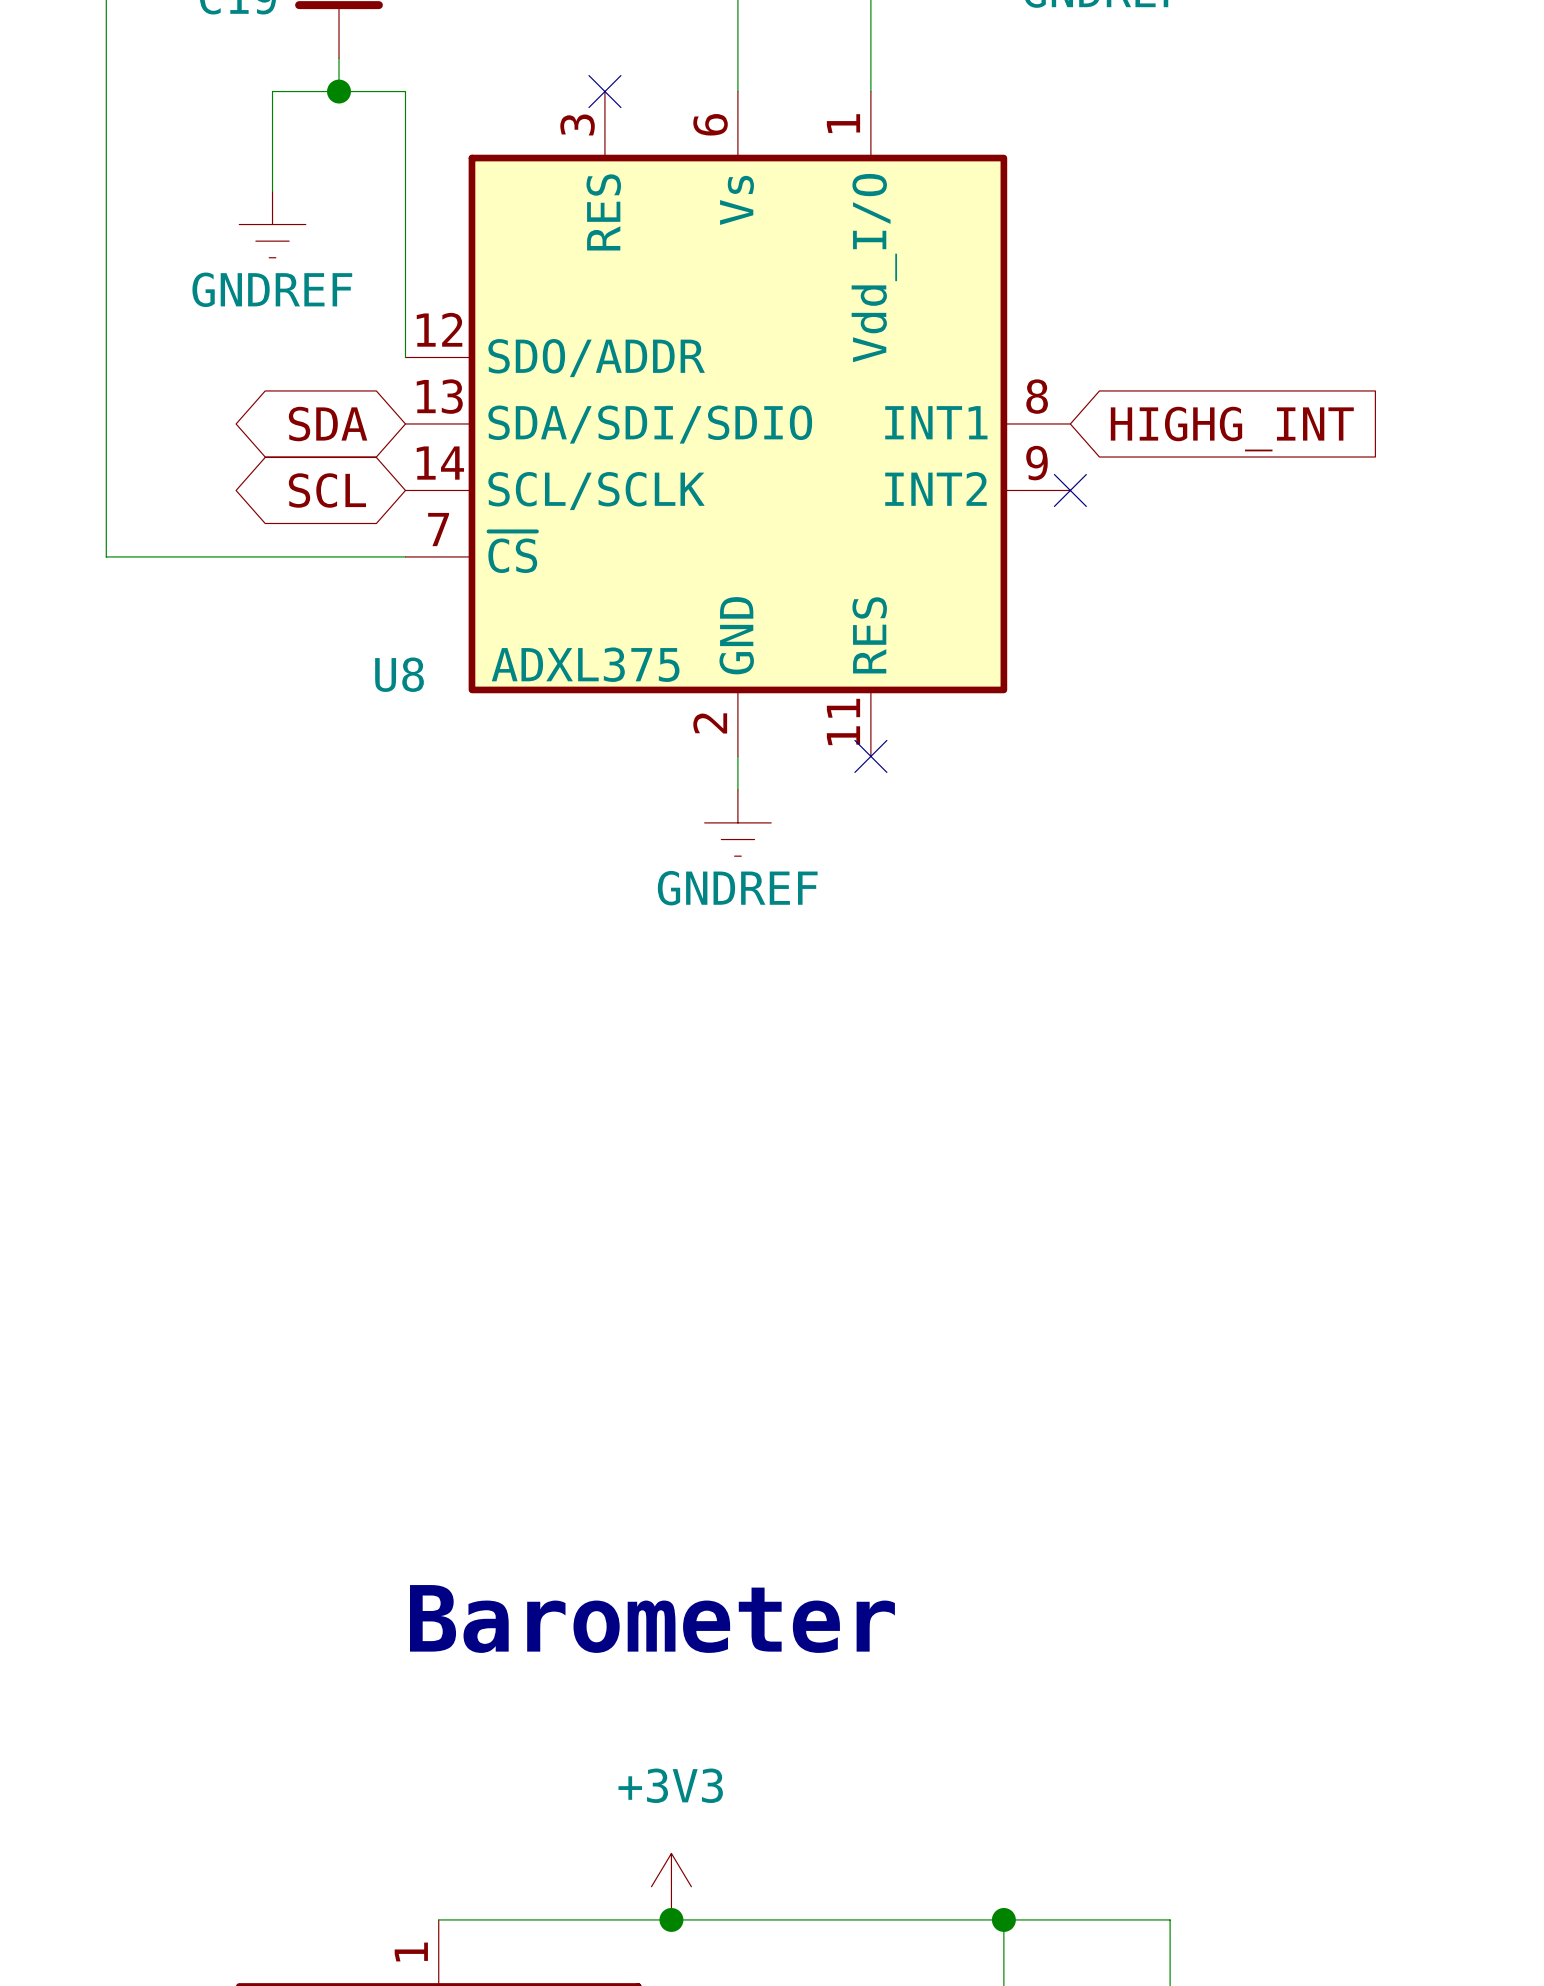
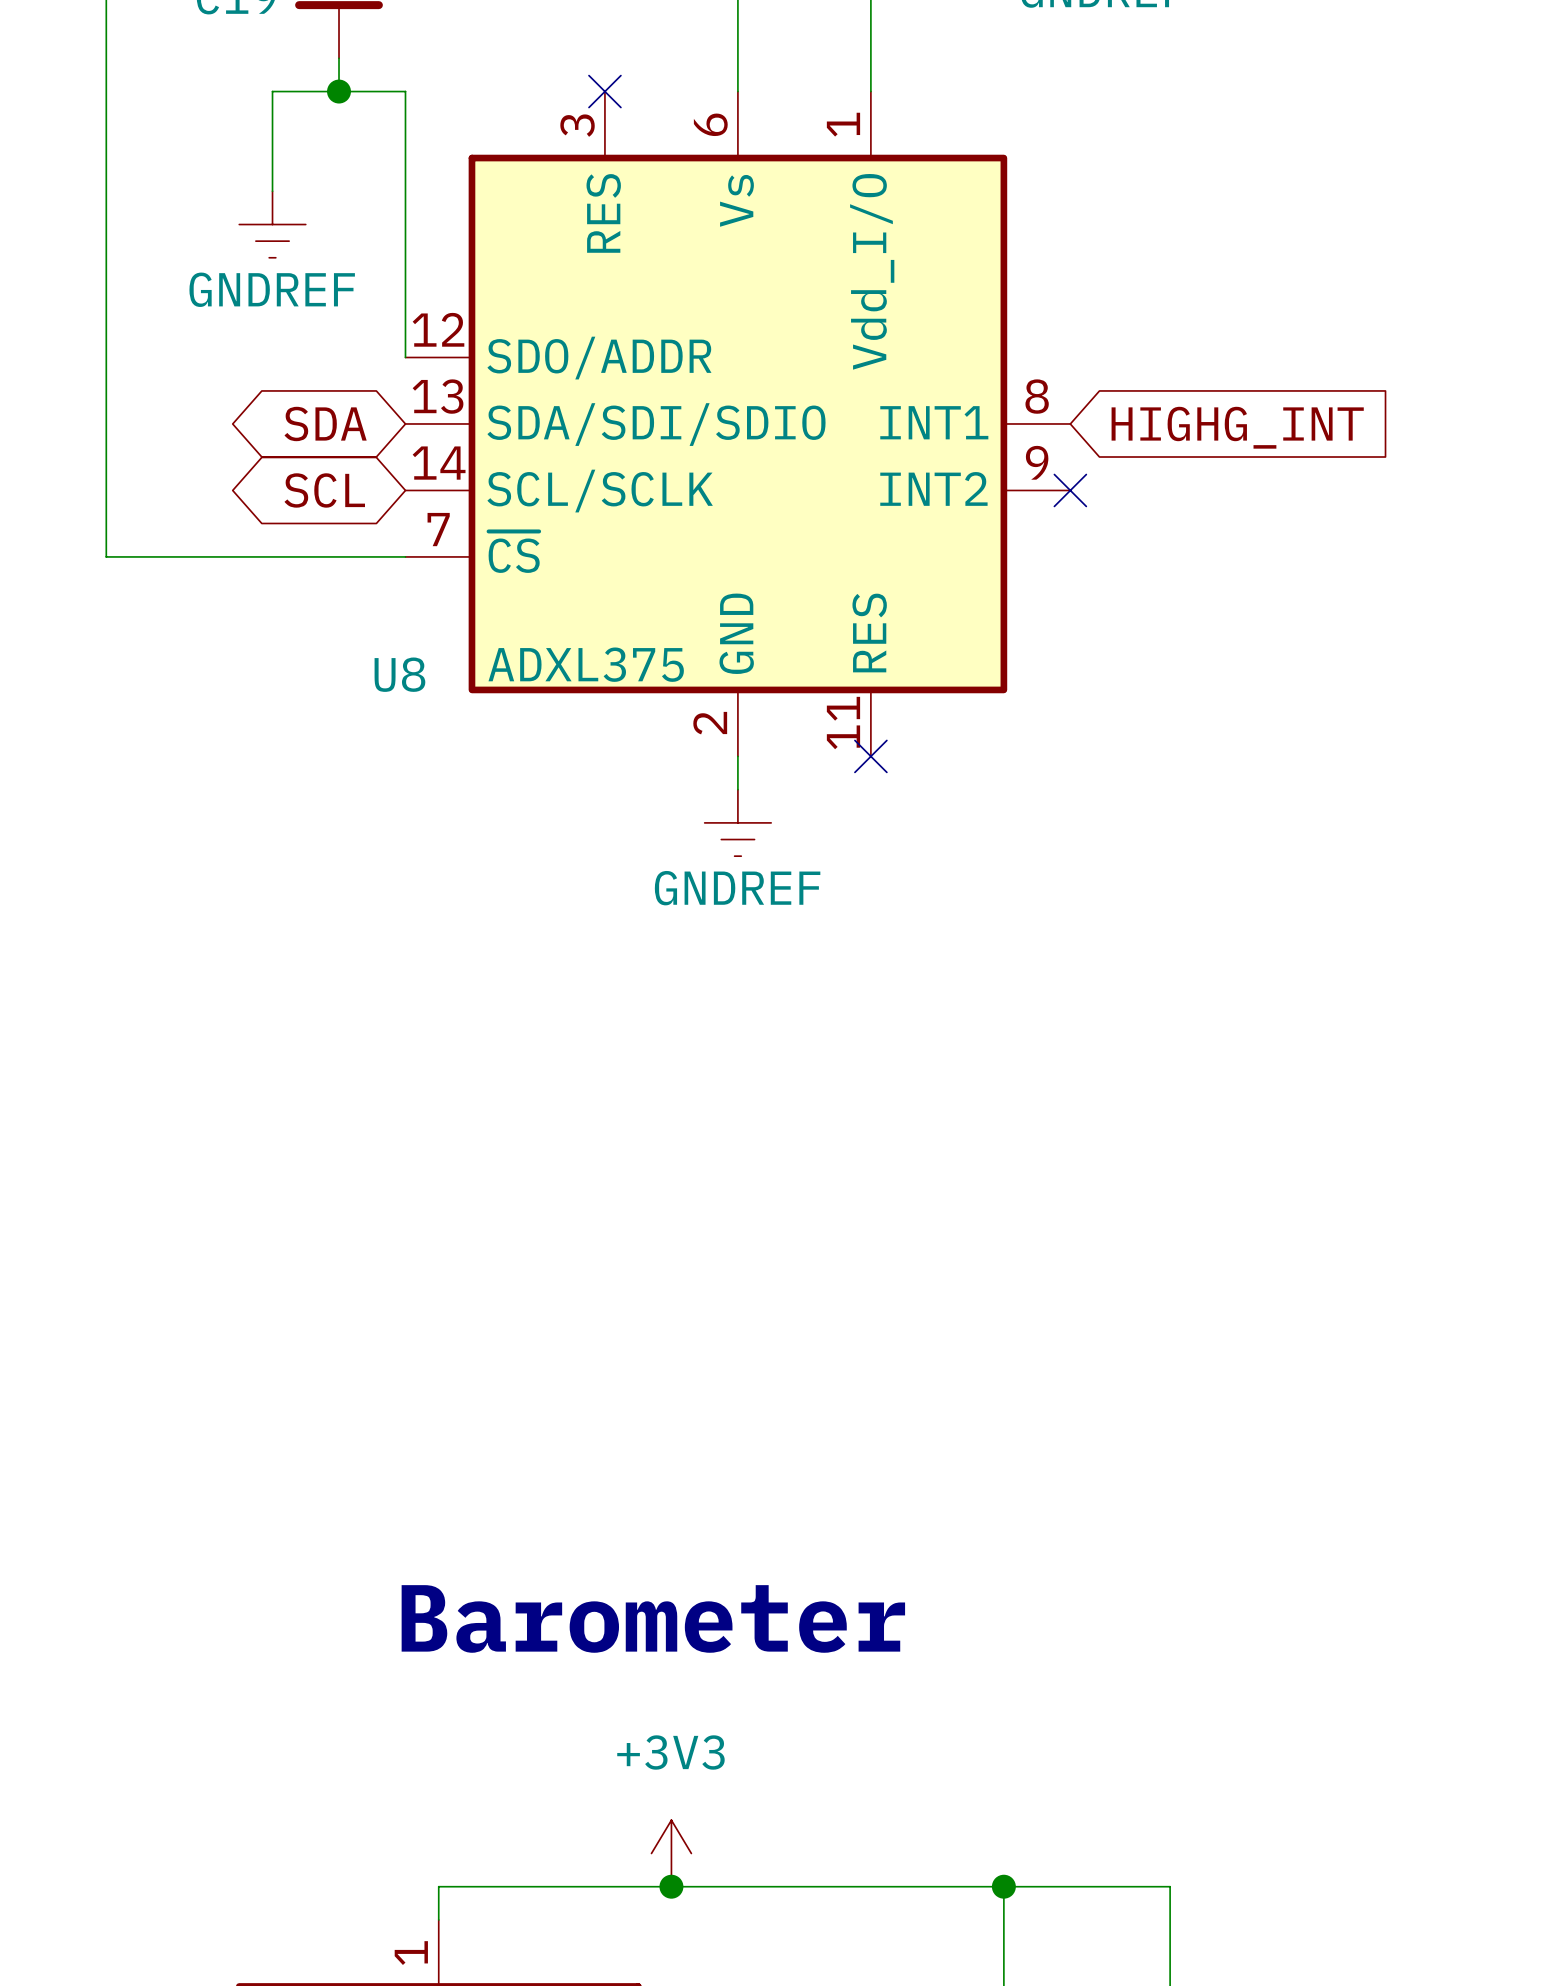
power symbol position: +3V3 (671, 1886) -> +3V3 (671, 1853)
wire: none -> (1003, 1886) (1003, 1919)
wire: (438, 1919) (1170, 1919) -> (438, 1919) (438, 1886) (1170, 1886) (1170, 1919)
junction position: (671, 1919) -> (671, 1886)
junction position: (1003, 1919) -> (1003, 1886)

